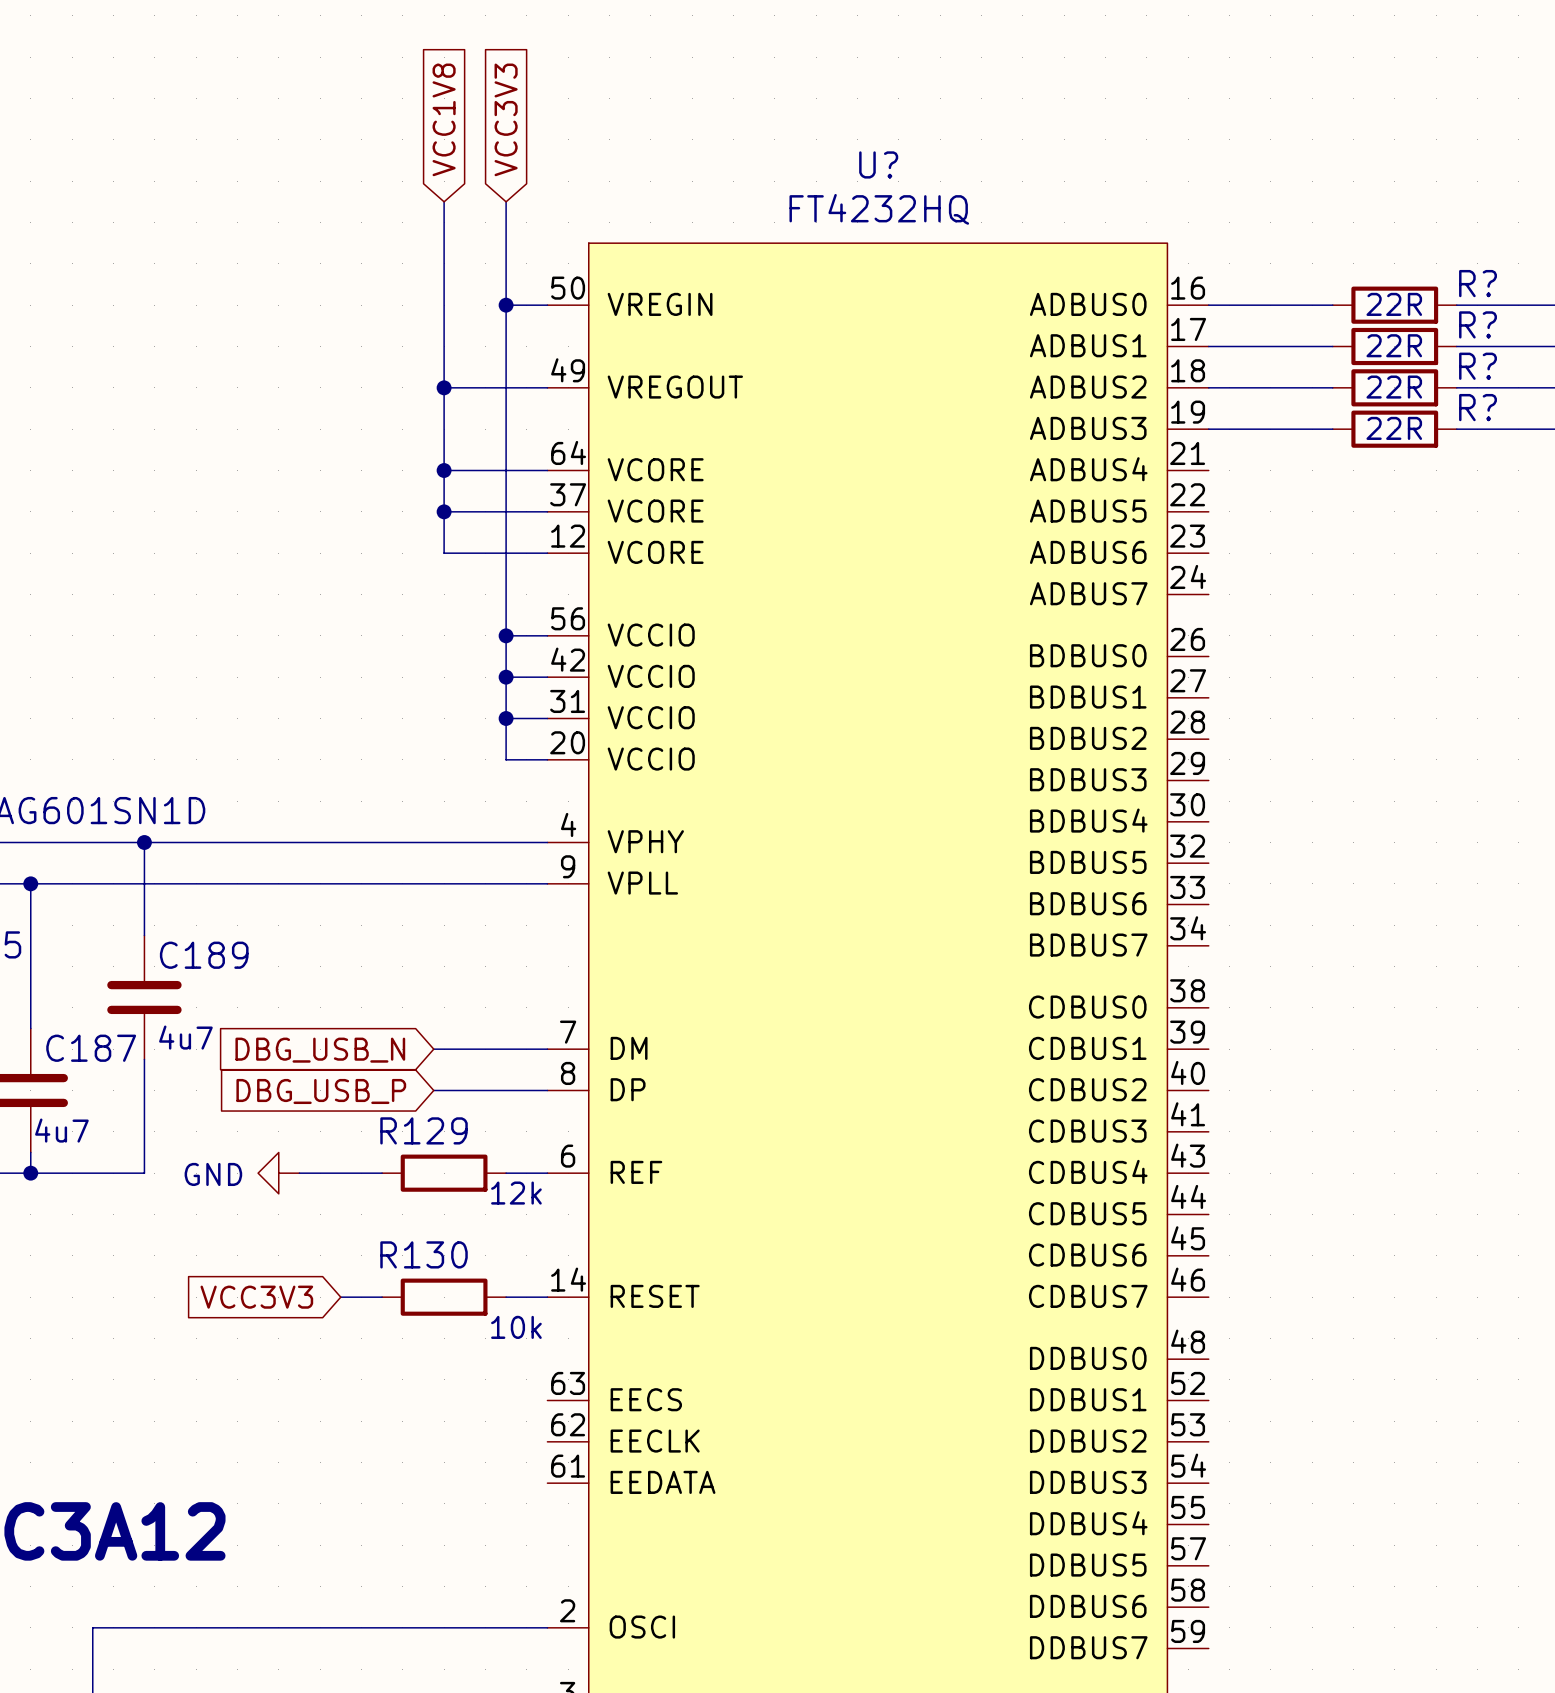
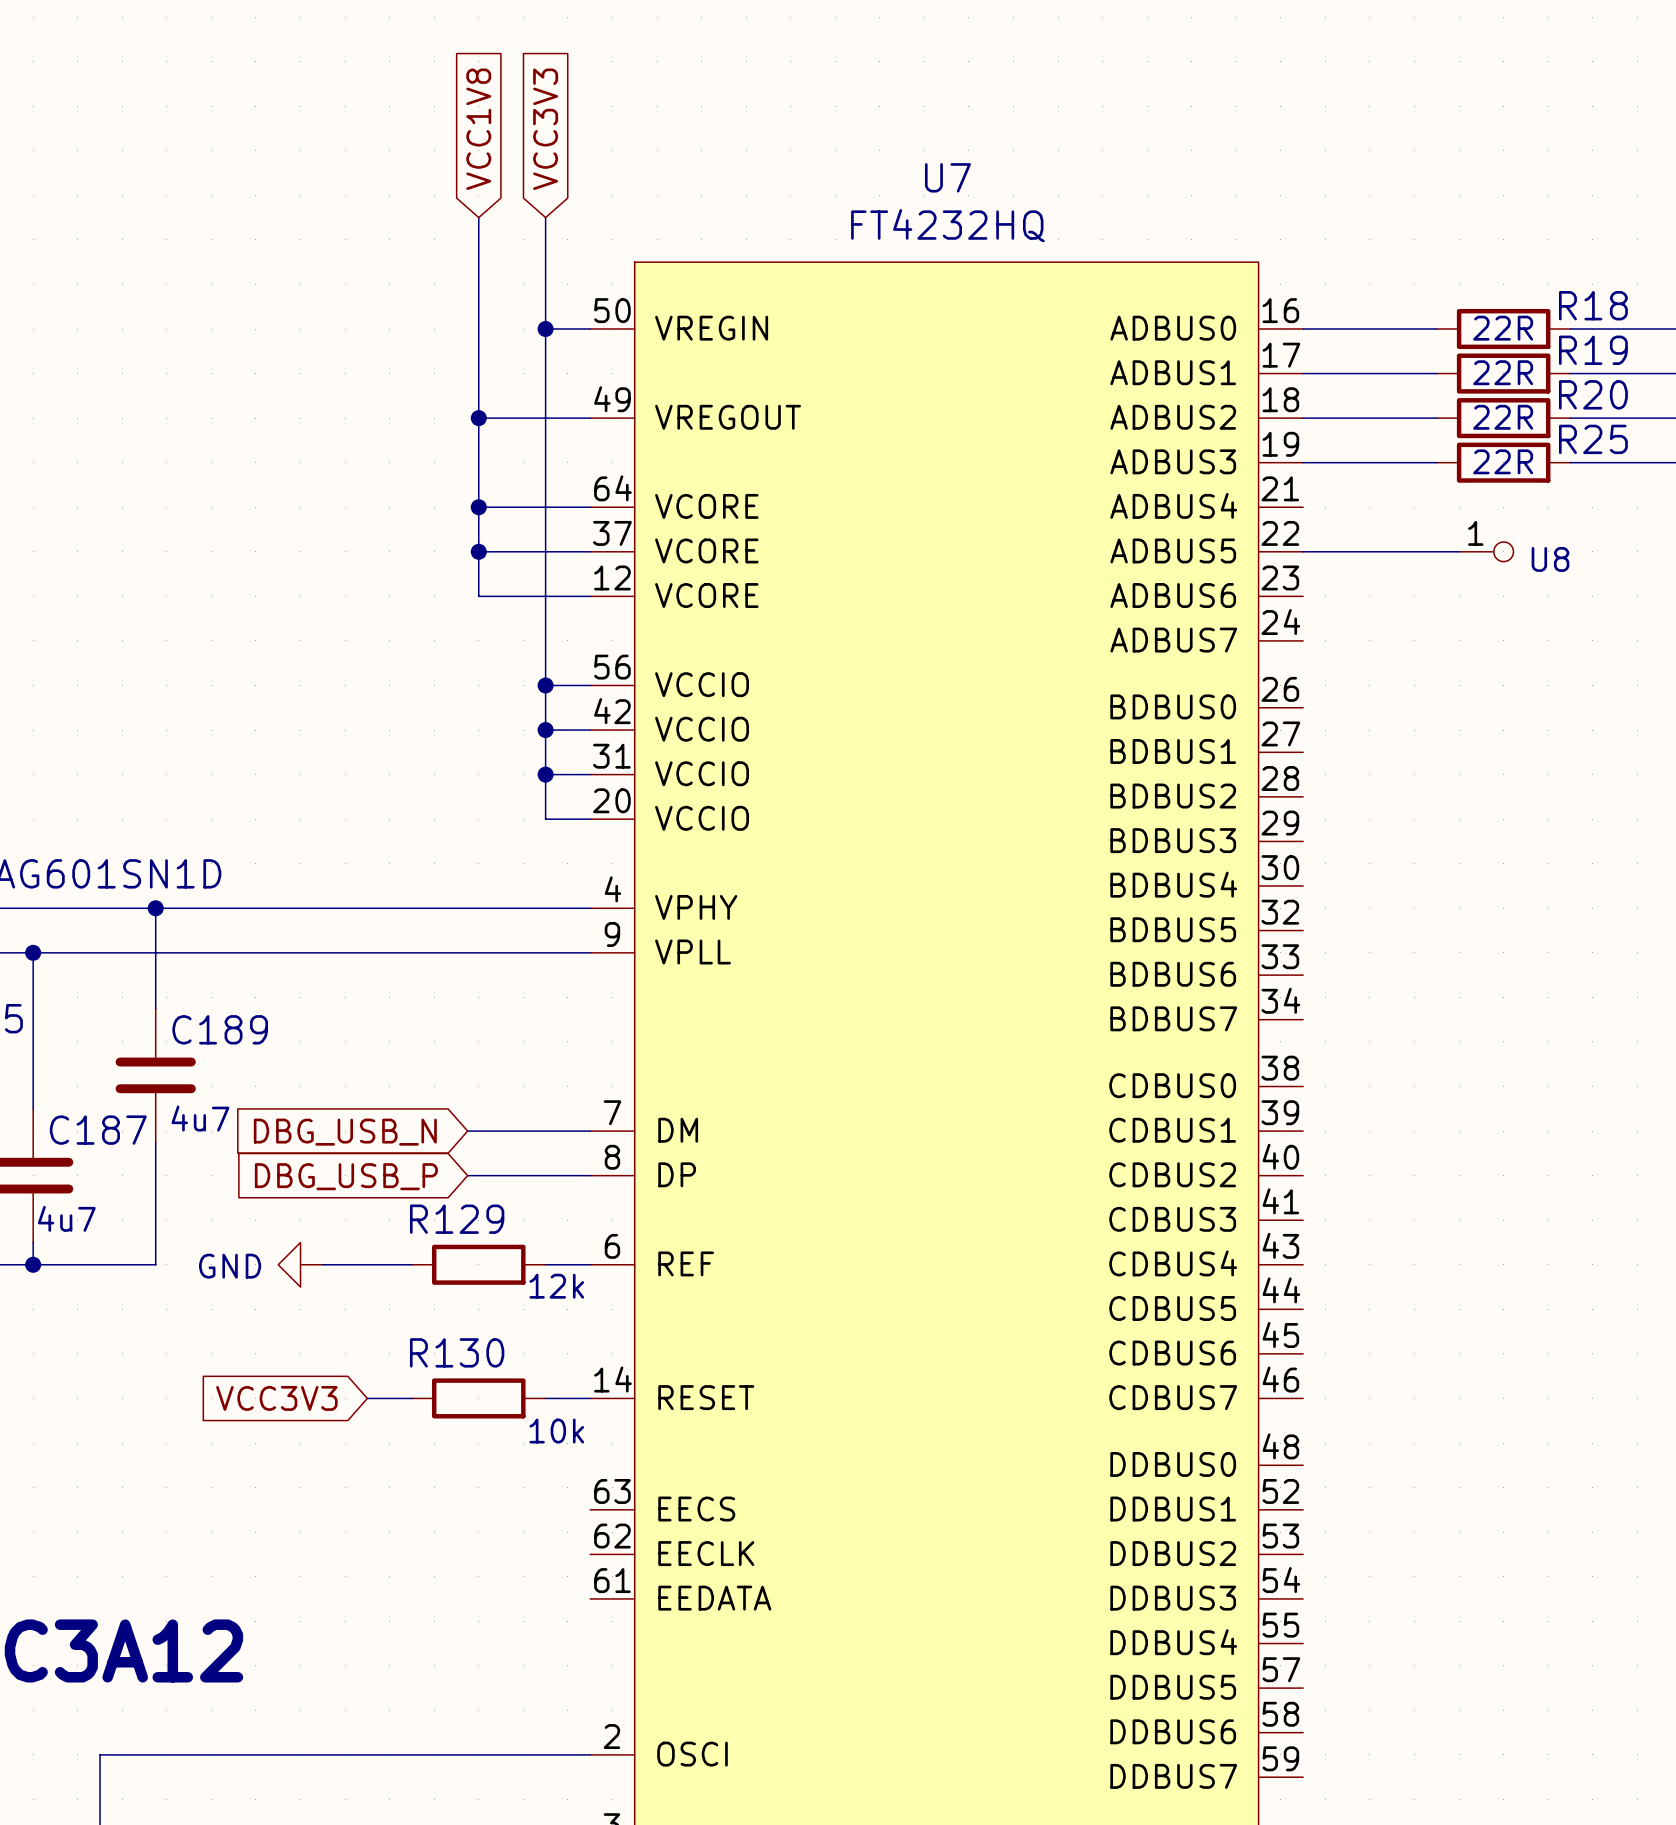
U? name: U? (878, 164) -> U7 (947, 177)
R? name: R? (1478, 283) -> R18 (1593, 305)
R? name: R? (1478, 324) -> R19 (1593, 350)
R? name: R? (1478, 366) -> R20 (1593, 394)
R? name: R? (1478, 407) -> R25 (1593, 439)
wire: none -> (1303, 551) (1459, 551)
U8: none -> (1486, 551)

